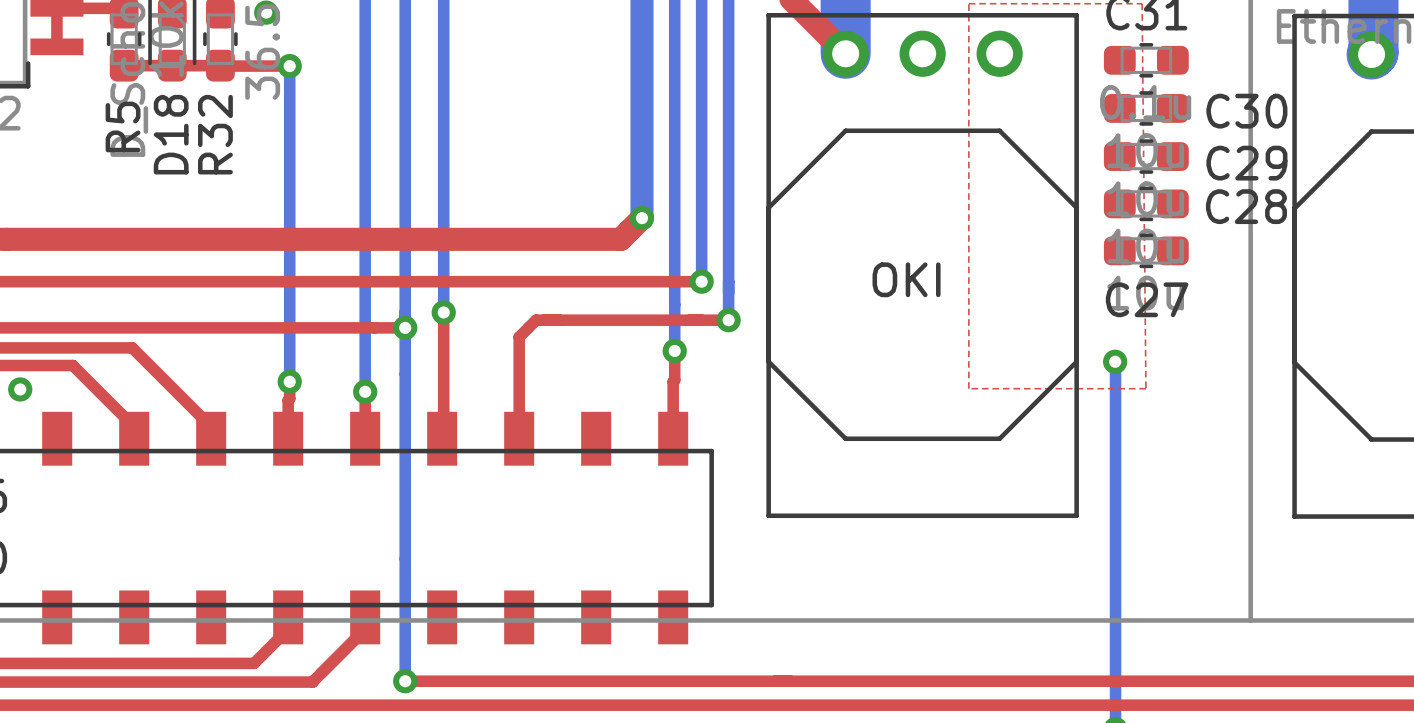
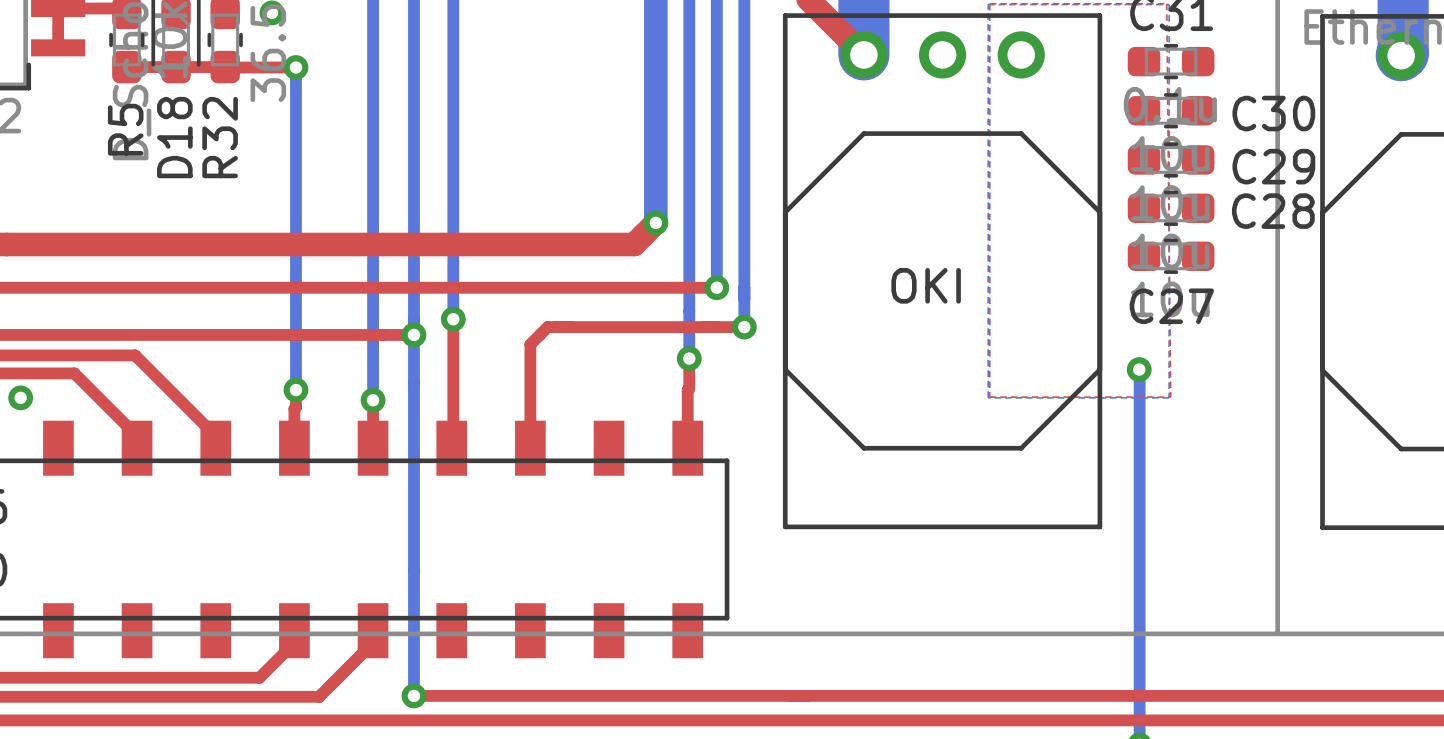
bottom zone outline: none -> (988, 4) (1169, 4) (1169, 397) (988, 397) (988, 4)

